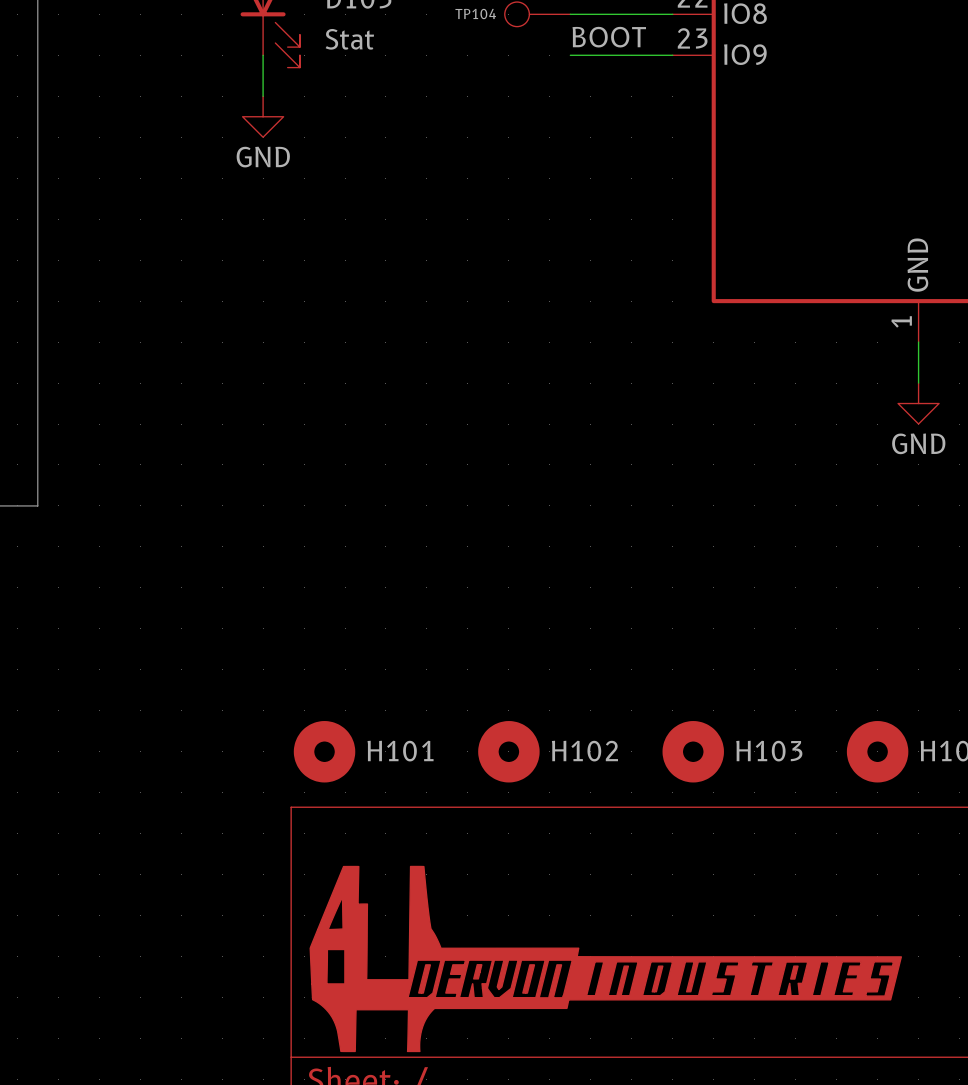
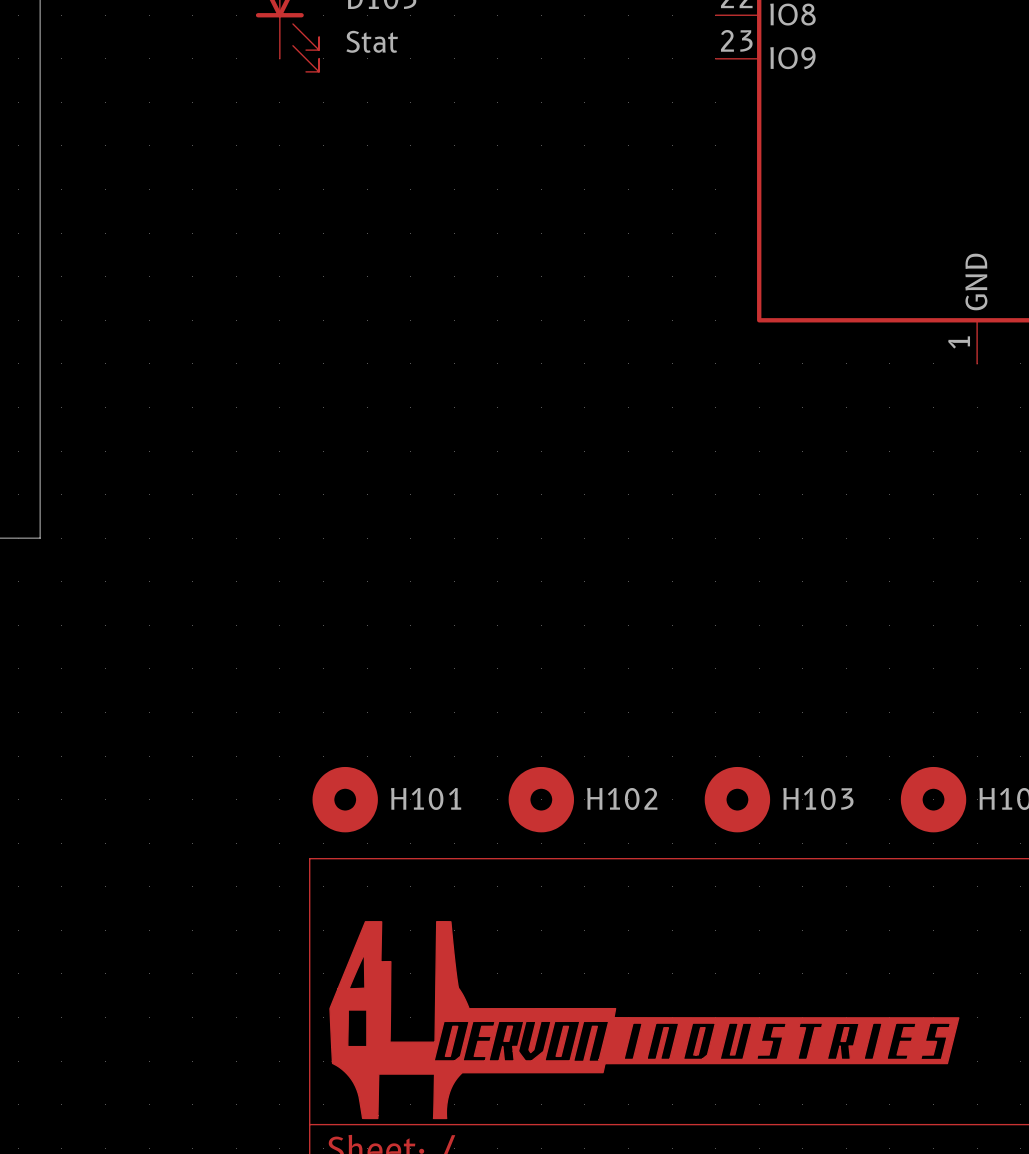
TP104: (537, 14) -> none
wire: (570, 14) (672, 14) -> none
label: BOOT (609, 37) -> none
wire: (263, 55) (263, 96) -> none
wire: (570, 55) (672, 55) -> none
power symbol: GND (263, 116) -> none
wire: (918, 342) (918, 383) -> none
power symbol: GND (918, 403) -> none

